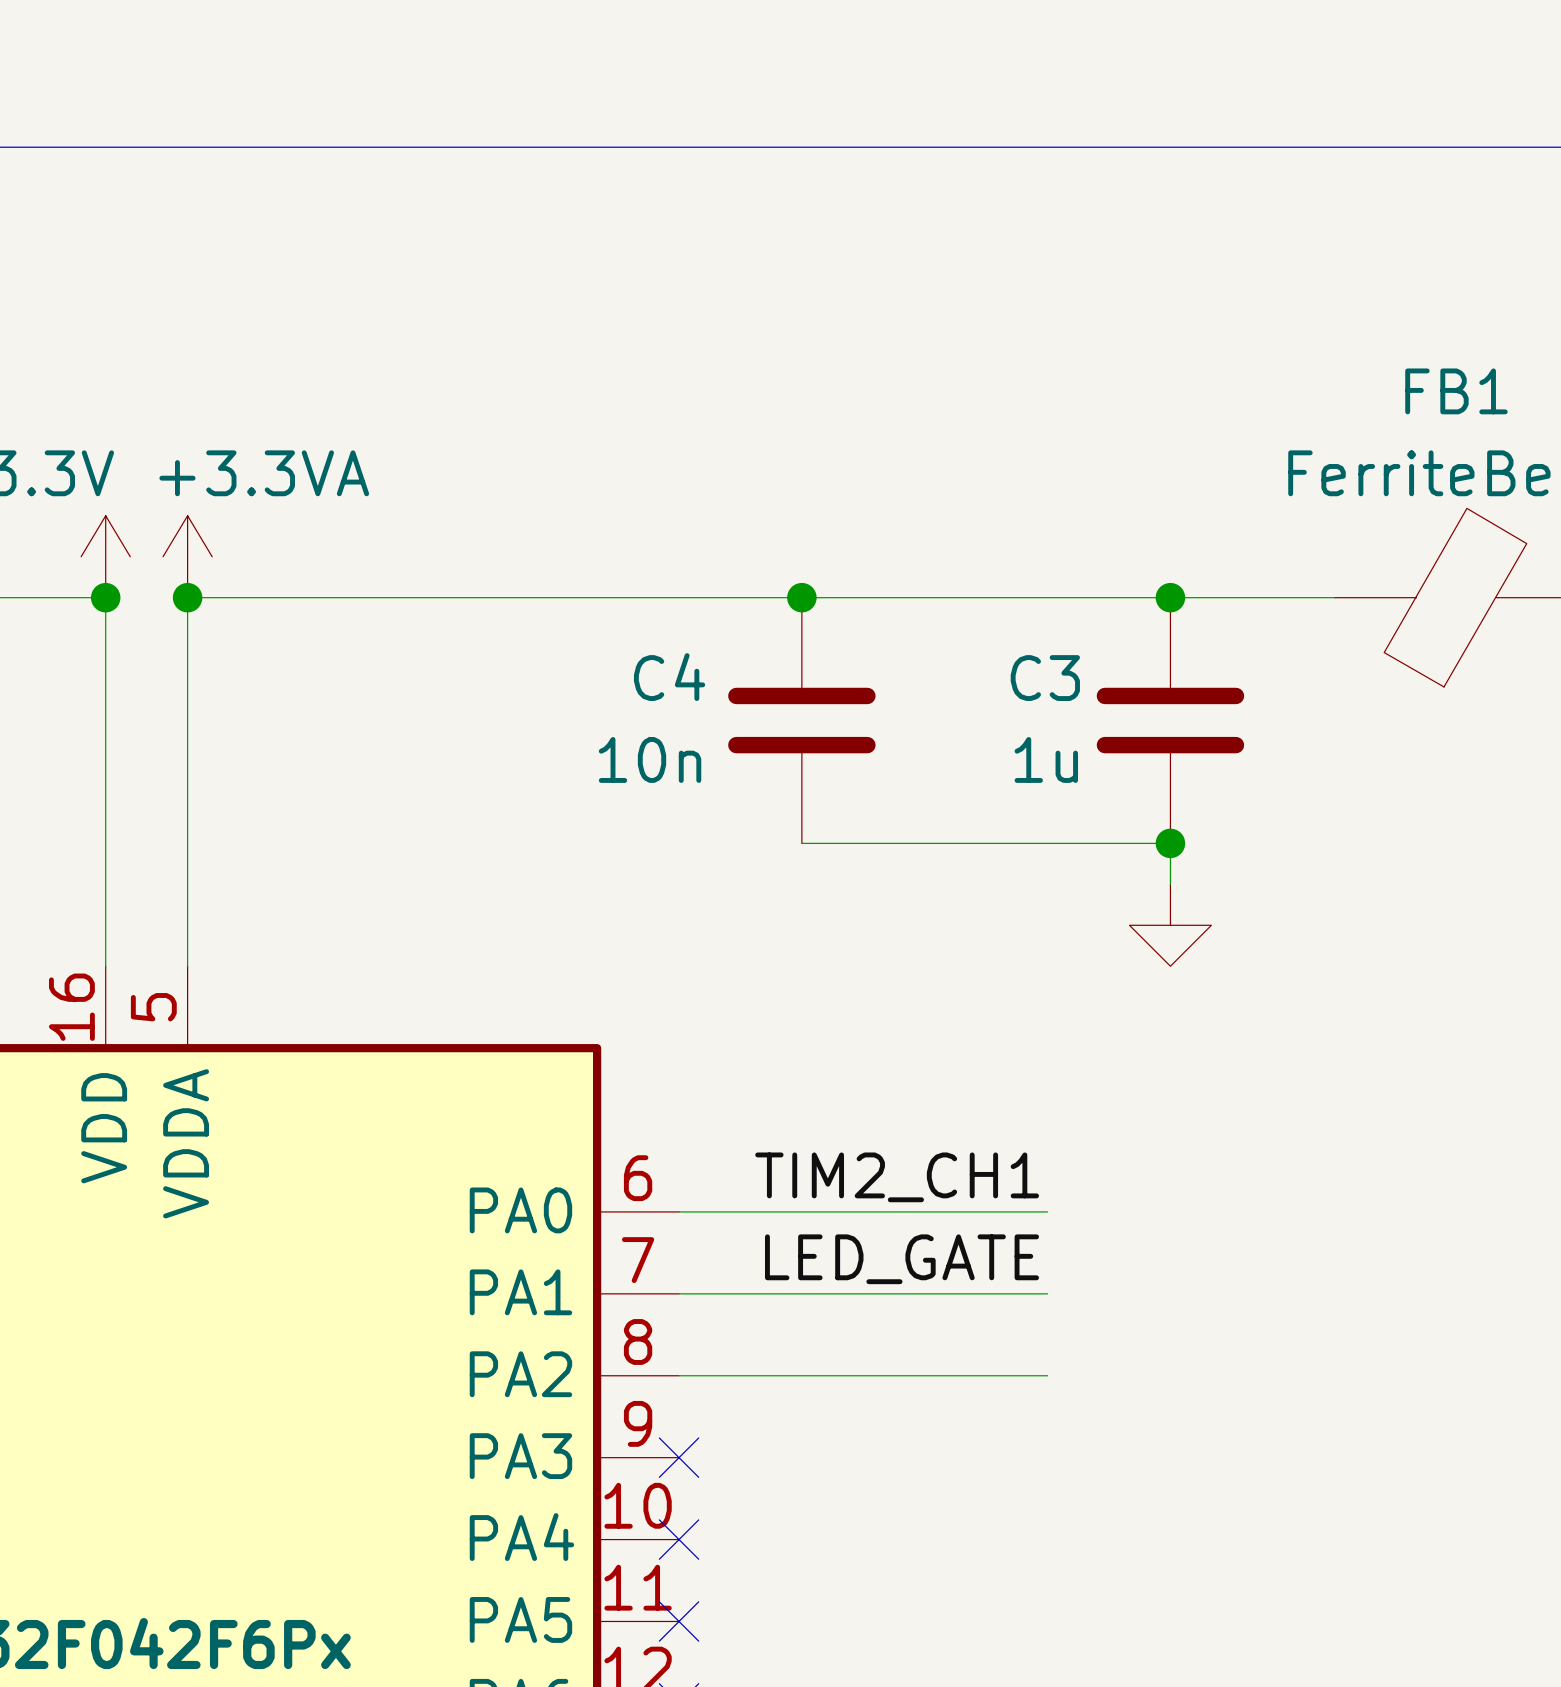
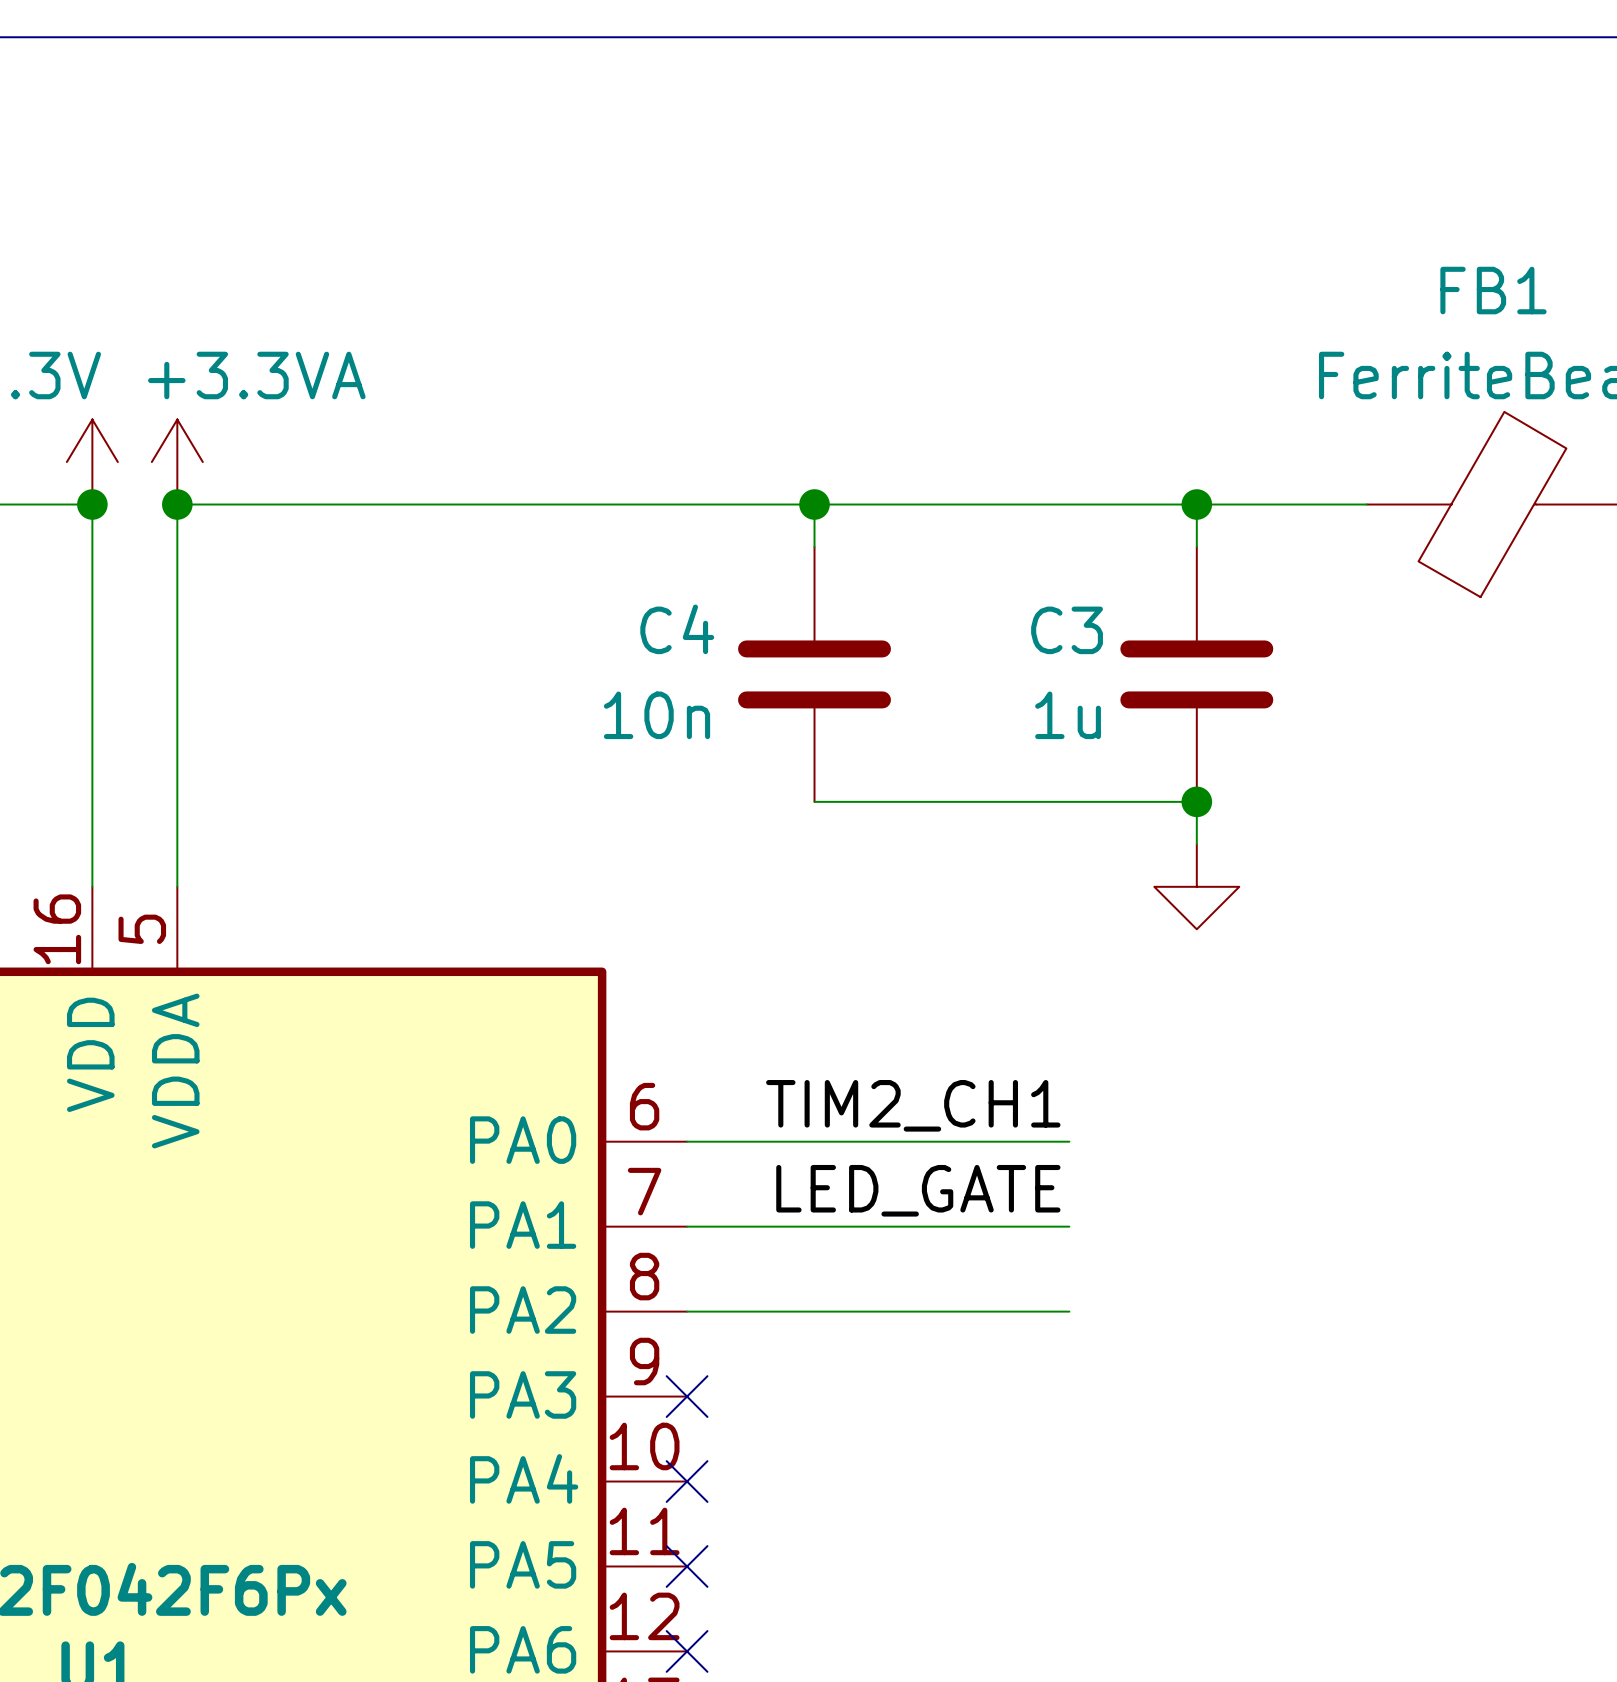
C4 position: (801, 720) -> (814, 674)
C3 position: (1170, 720) -> (1196, 674)
wire: (801, 843) (1170, 843) (1170, 884) -> (814, 801) (1196, 801) (1196, 844)
junction position: (1170, 843) -> (1196, 801)
power symbol position: (1170, 925) -> (1196, 886)

